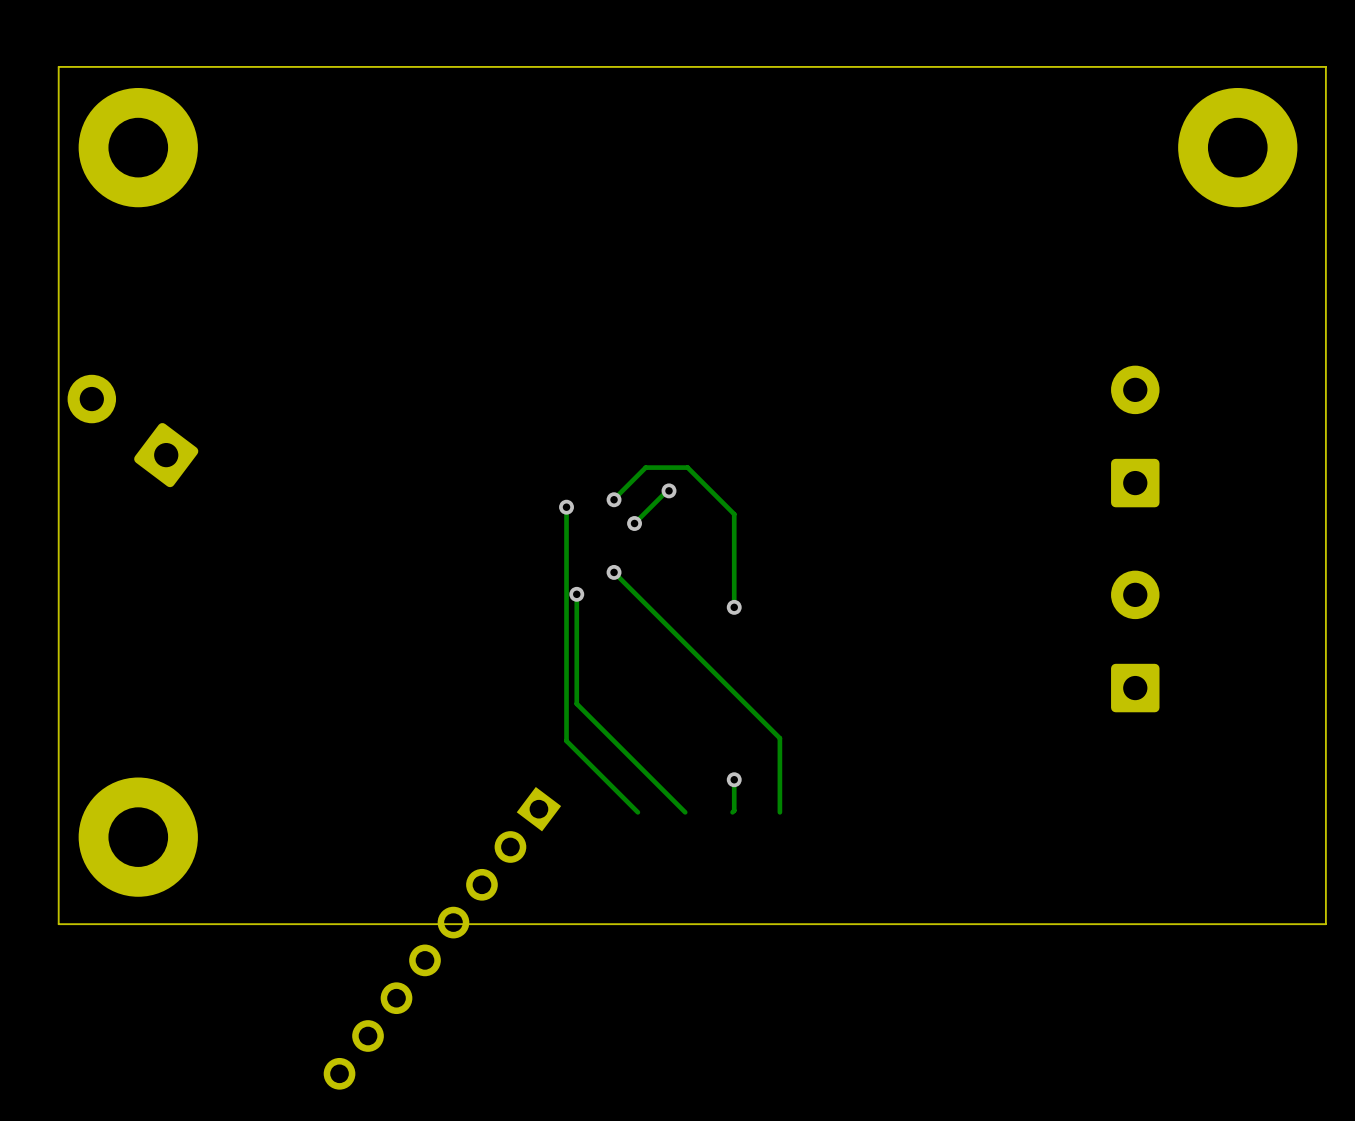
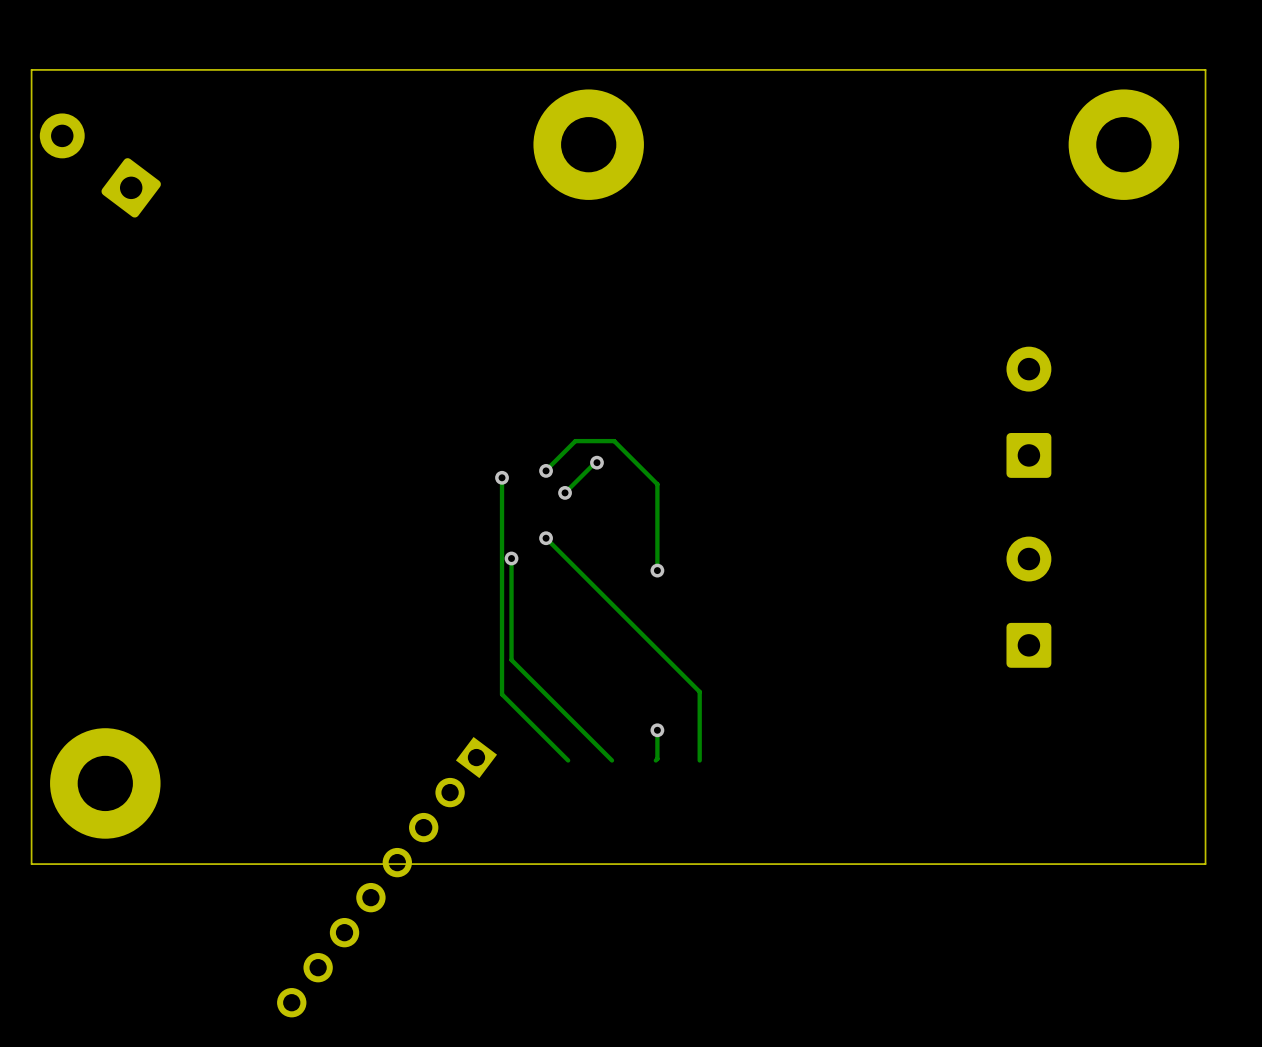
part: (138, 147) -> none
part: none -> (588, 144)
part position: (132, 430) -> (100, 165)

